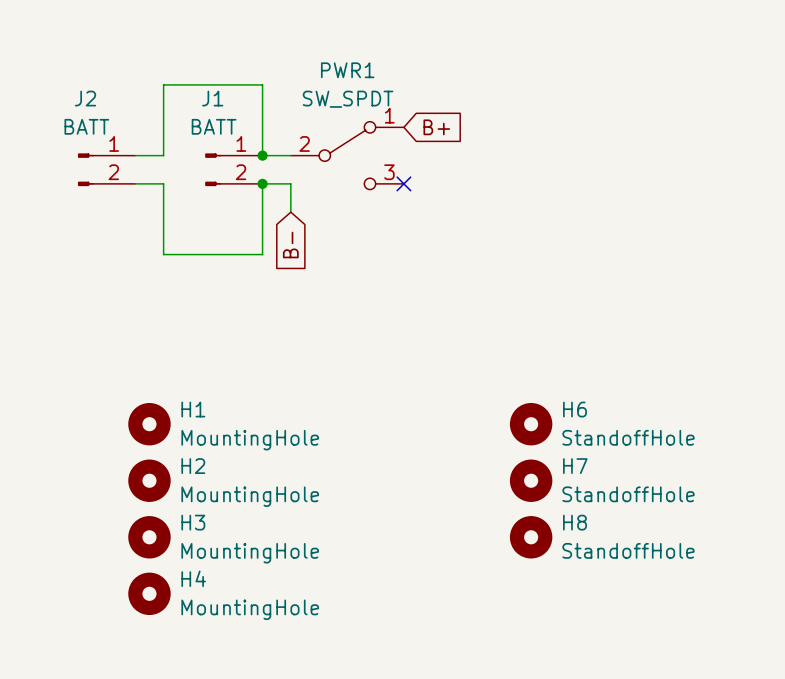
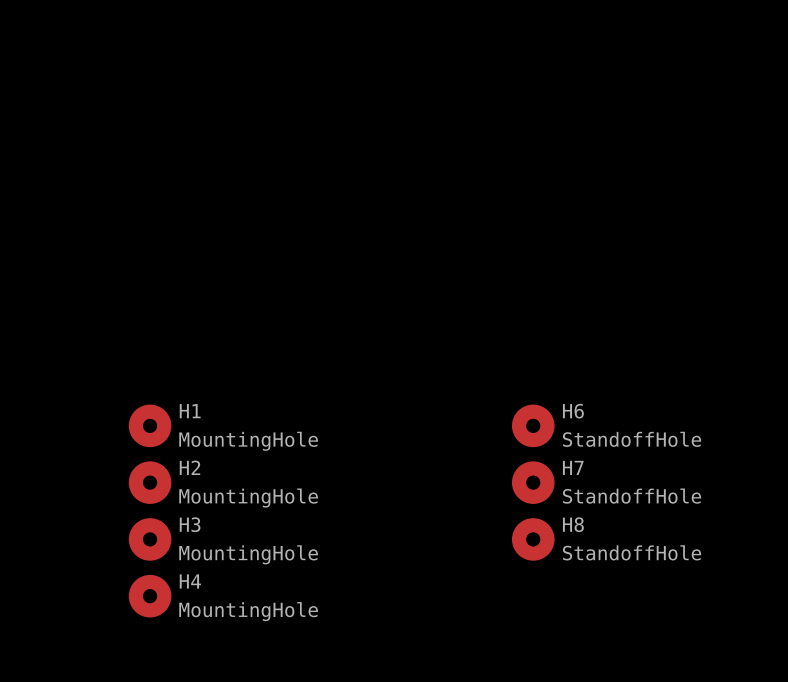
global label: B+ (436, 127) -> none
wire: (135, 155) (163, 155) (163, 84) (262, 84) (262, 155) (290, 155) -> none
junction: (262, 155) -> none
PWR1: SW_SPDT (347, 155) -> none
J2: BATT (106, 169) -> none
J1: BATT (233, 169) -> none
wire: (135, 183) (163, 183) (163, 254) (262, 254) (262, 183) (290, 183) (290, 212) -> none
junction: (262, 183) -> none
no-connect mark: (403, 183) -> none
global label: B- (290, 245) -> none

